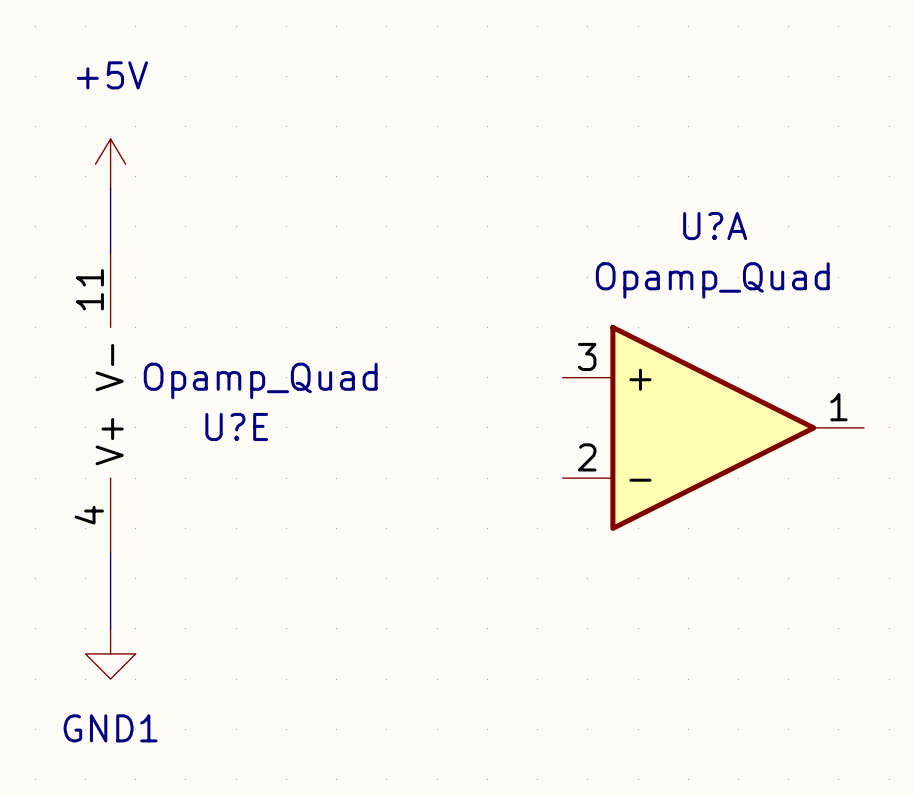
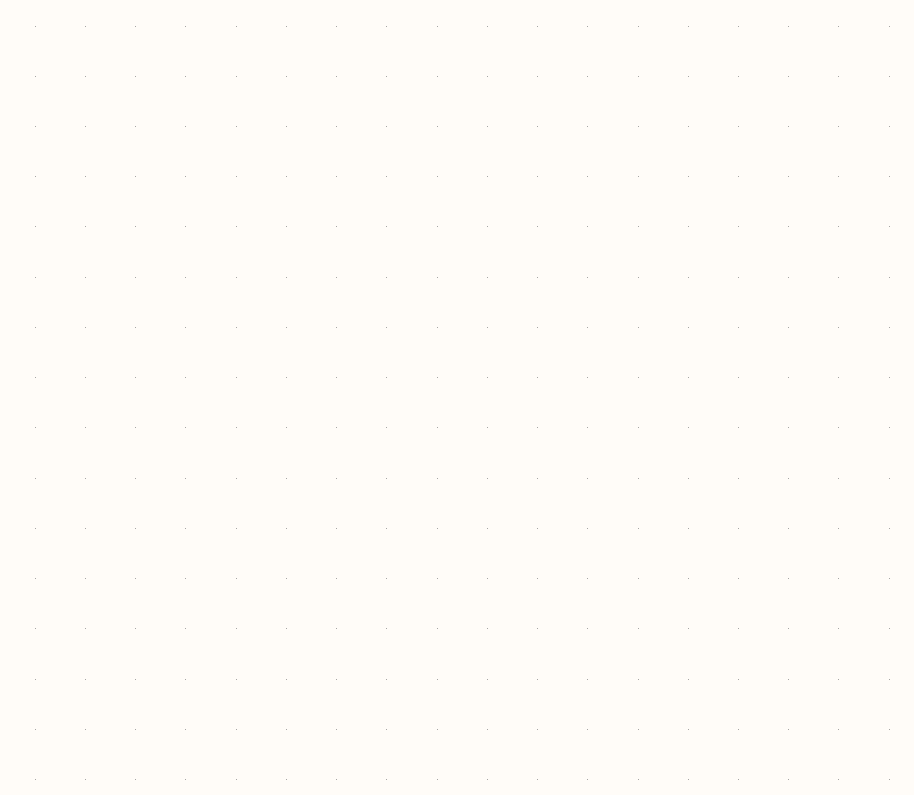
power symbol: +5V (110, 164) -> none
wire: (110, 189) (110, 252) -> none
U?E: Opamp_Quad (110, 402) -> none
U?A: Opamp_Quad (713, 427) -> none
wire: (110, 553) (110, 628) -> none
power symbol: GND1 (110, 653) -> none

